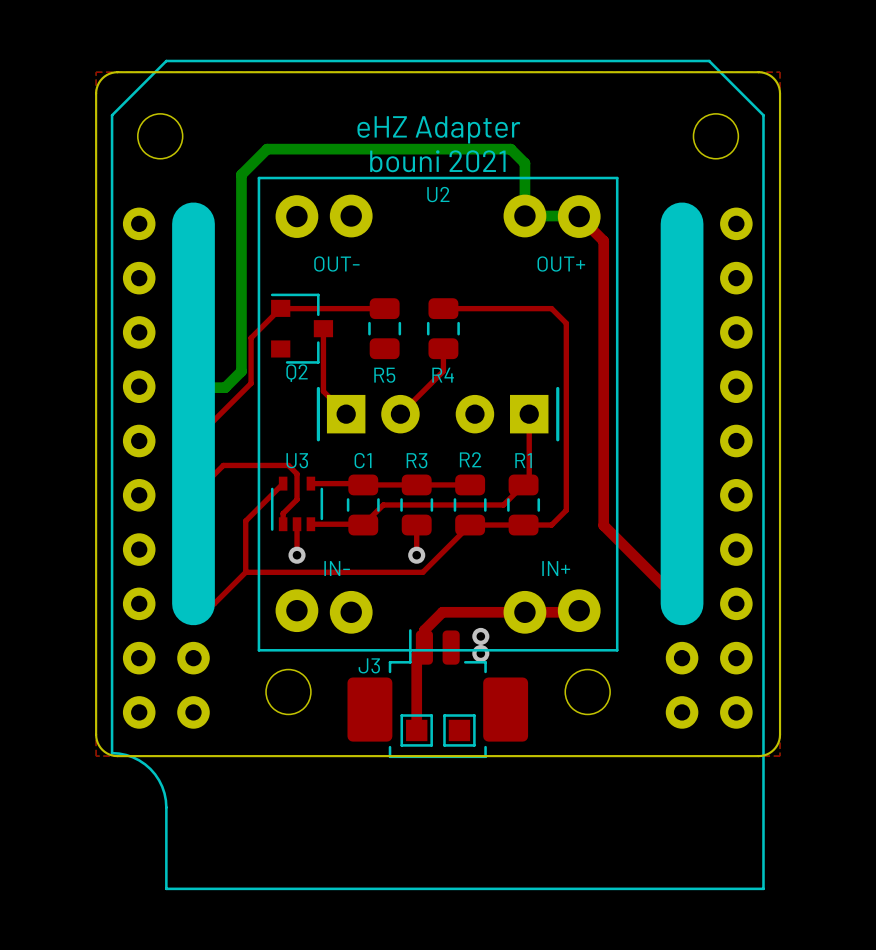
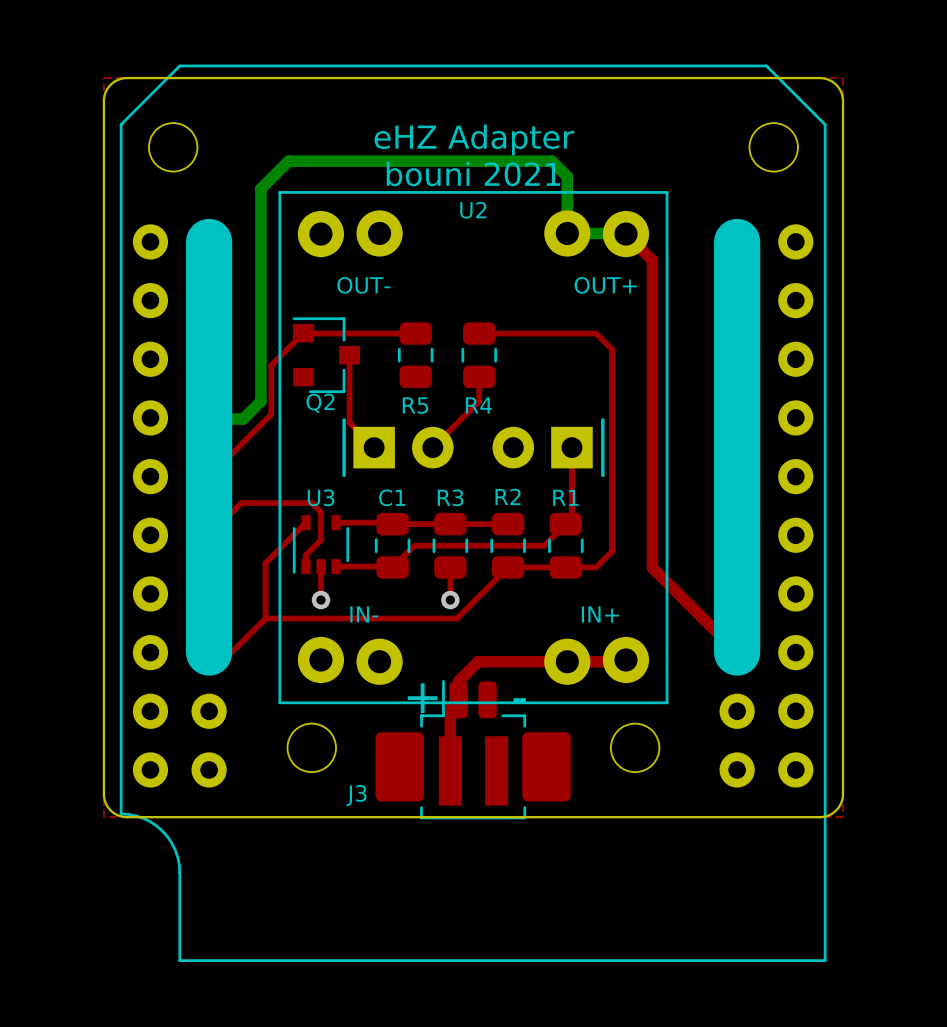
via: (480, 636) -> none
text: none -> + (422, 698)
text: none -> - (519, 700)
via: (480, 653) -> none
J3 name position: J3 (369, 665) -> J3 (356, 795)
part footprint: [400, 714, 433, 747] -> [438, 736, 462, 806]
part footprint: [443, 714, 476, 747] -> [485, 736, 509, 806]

